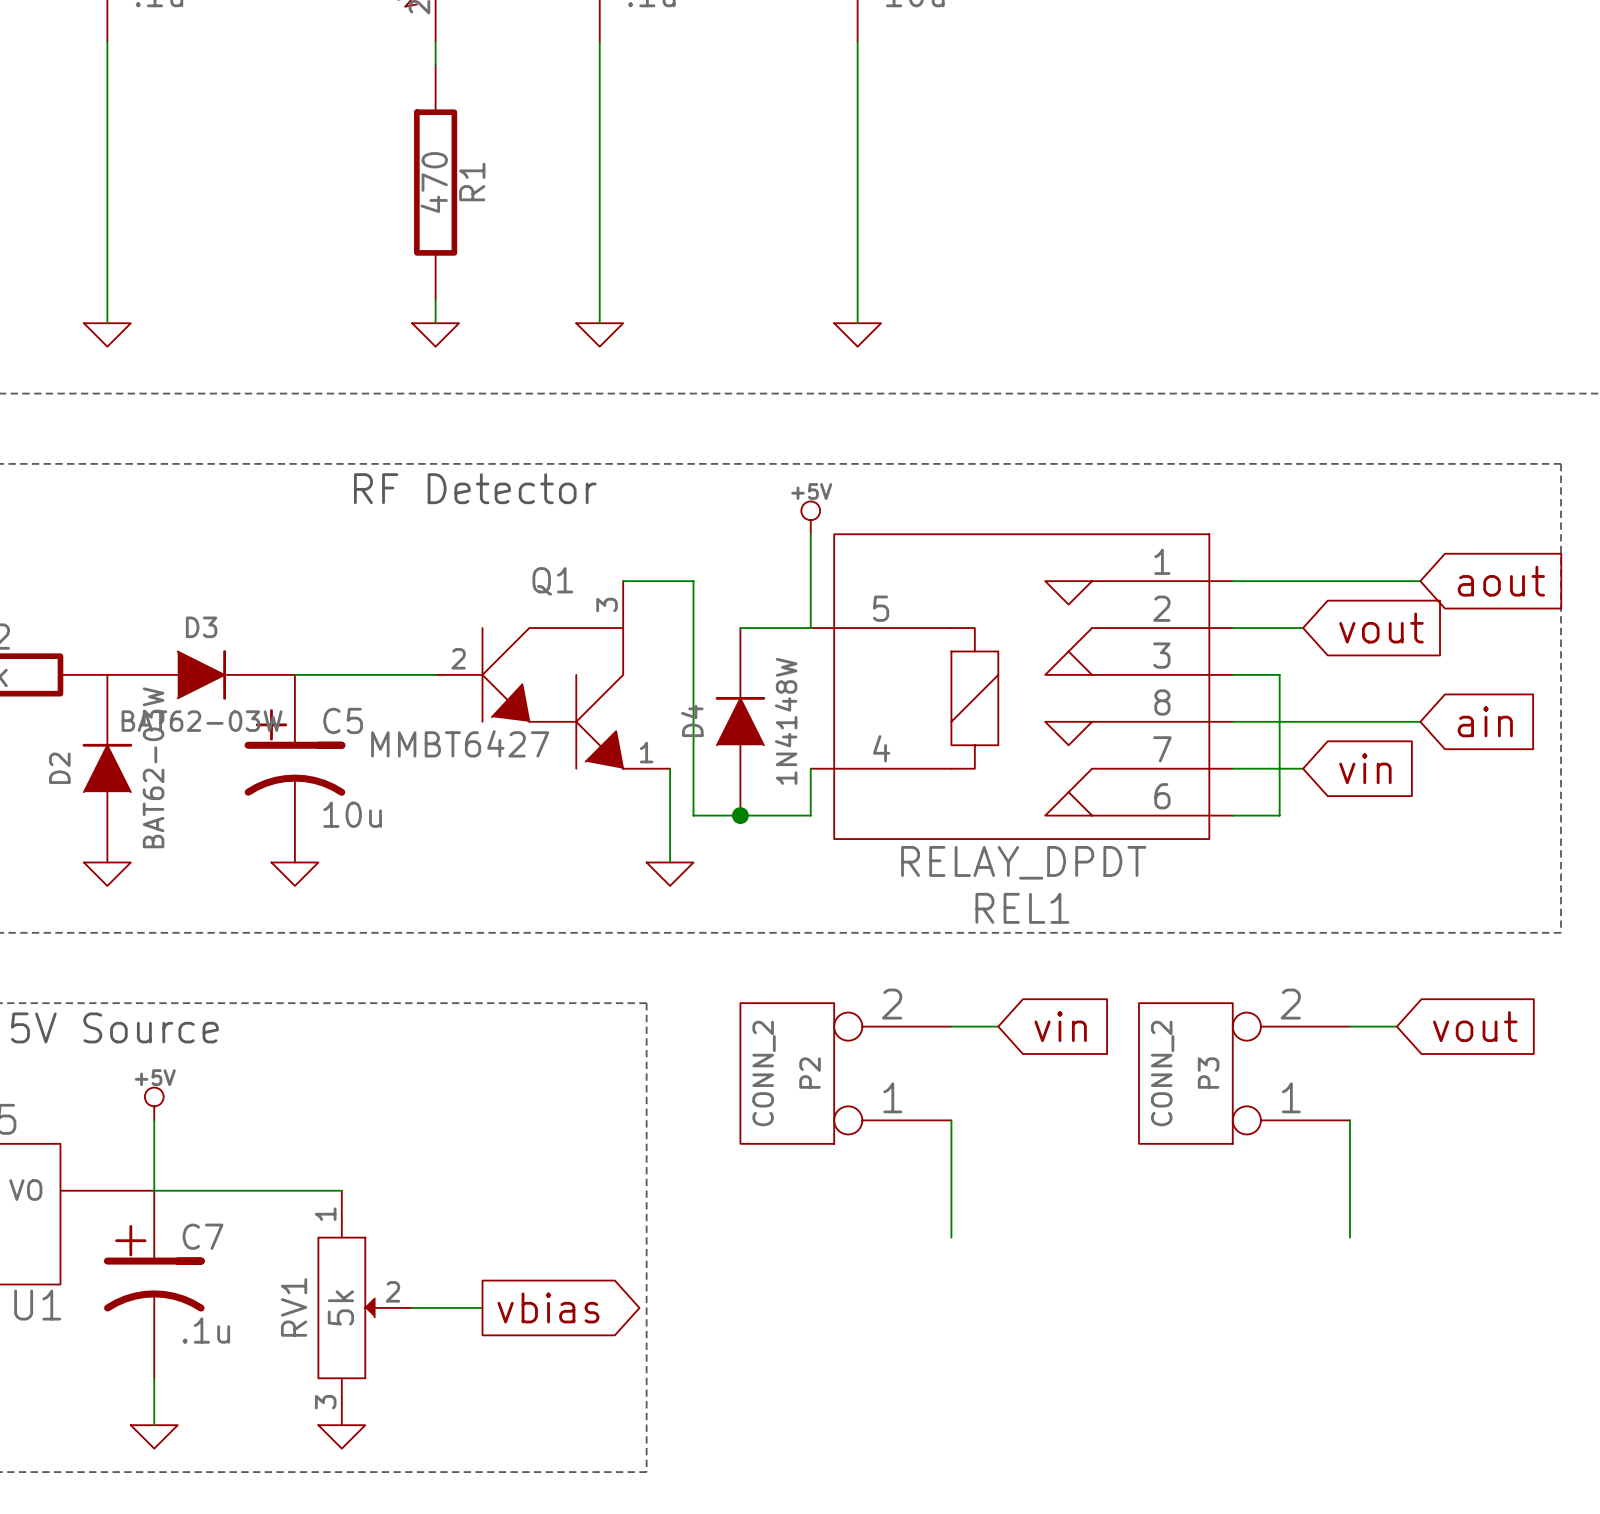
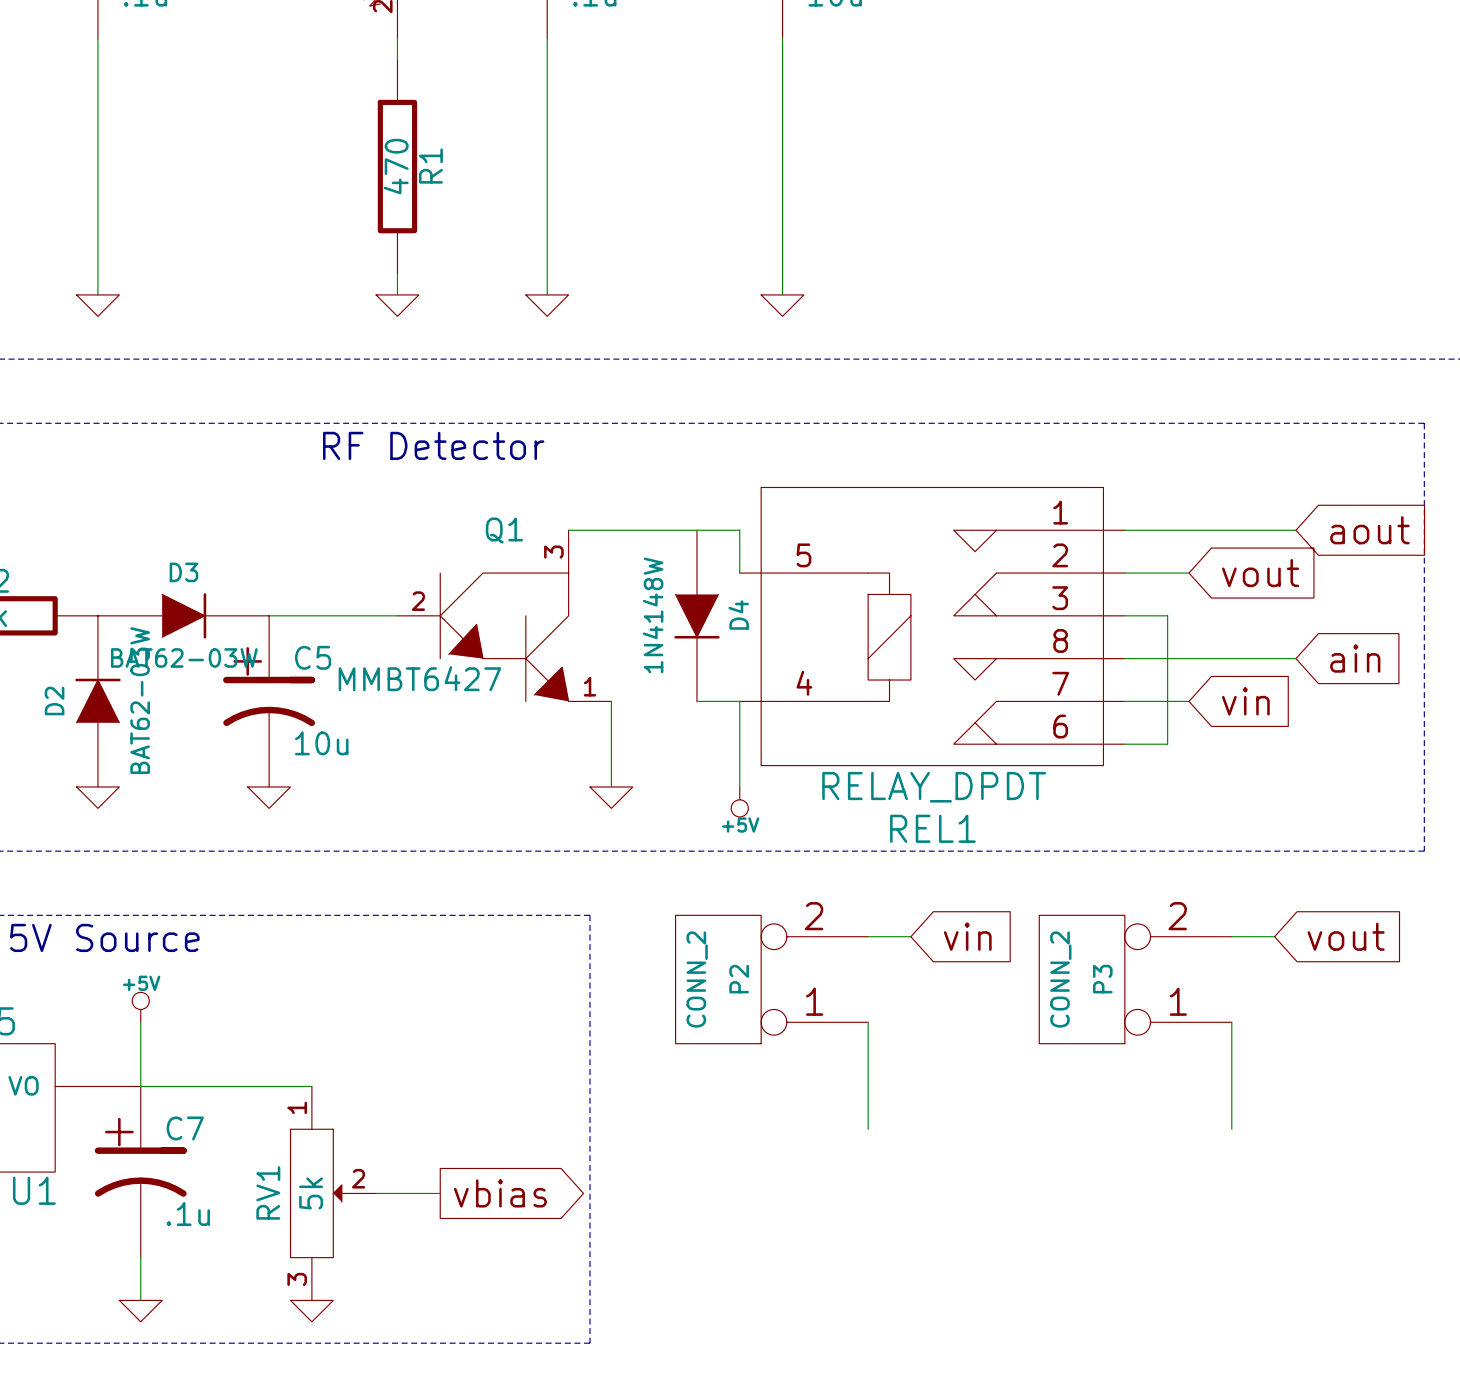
power symbol rotation: 0° (810, 517) -> 180° (739, 801)
power symbol position: +5V (810, 517) -> +5V (739, 801)
wire: (810, 534) (810, 581) -> (632, 530) (739, 530)
wire: (693, 581) (693, 815) (810, 815) -> (739, 786) (739, 744)
wire: (740, 628) (810, 628) -> none
D4 rotation: 0° (740, 721) -> 180° (696, 616)
wire: none -> (696, 701) (739, 701)
junction: (740, 815) -> none

